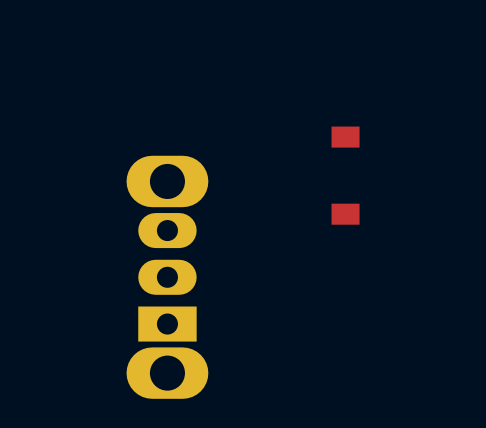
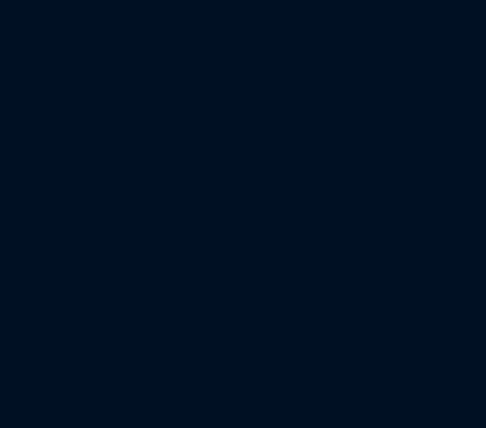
part: (345, 175) -> none
part: (167, 277) -> none

